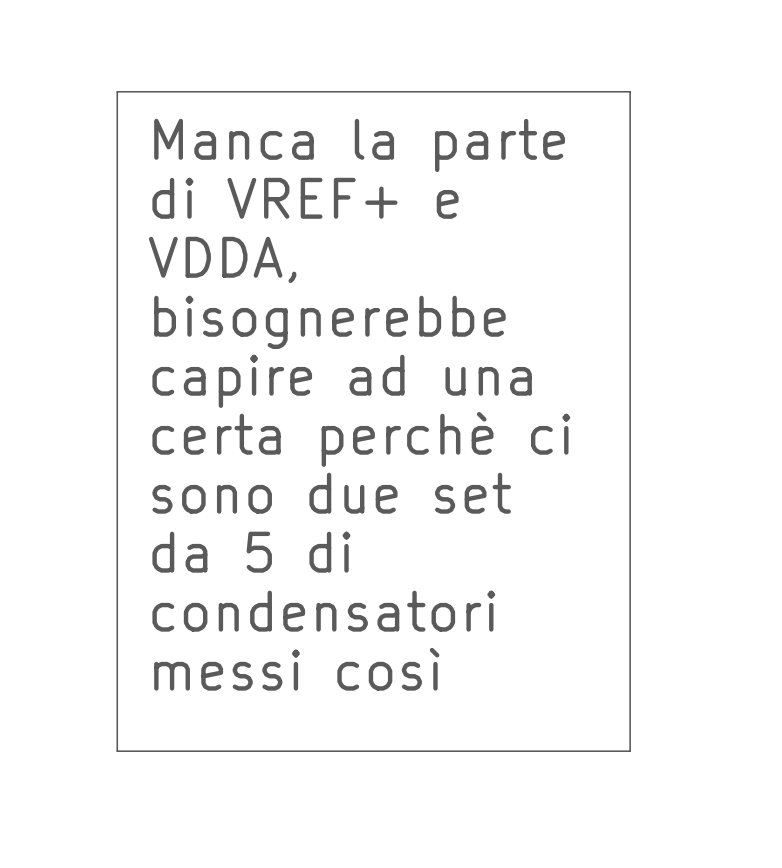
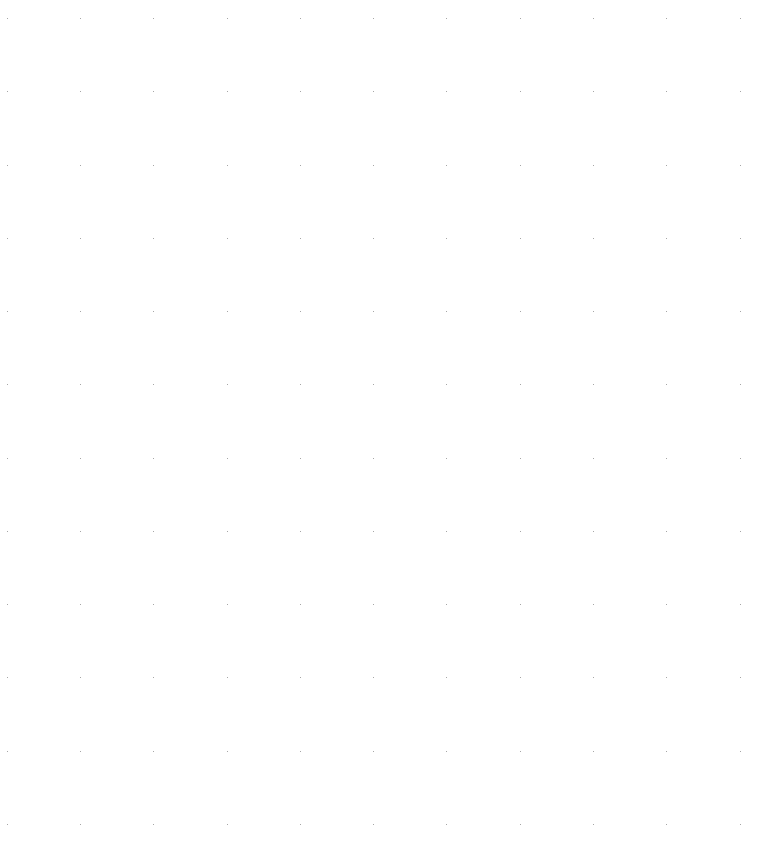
line: (117, 91) (630, 91) (630, 751) (117, 751) (117, 91) -> none
text: Manca la parte (359, 145) -> none
text: di VREF+ e (305, 198) -> none
text: VDDA, (222, 259) -> none
text: bisognerebbe (329, 322) -> none
text: capire ad una (342, 381) -> none
text: certa perchè ci (361, 439) -> none
text: sono due set (331, 493) -> none
text: da 5 di (251, 552) -> none
text: condensatori (323, 611) -> none
text: messi così (296, 669) -> none

